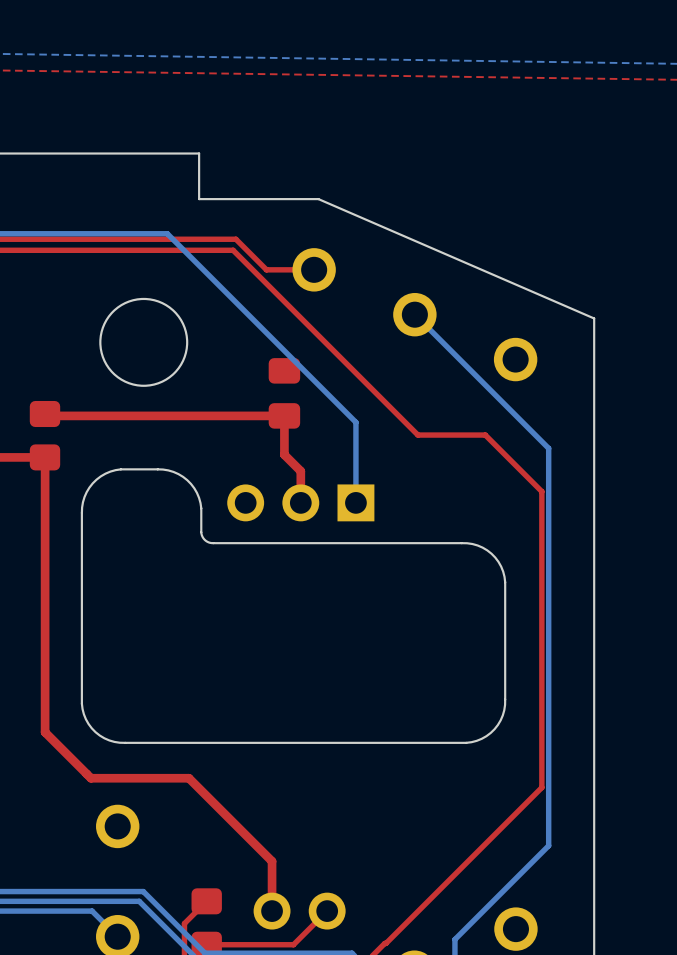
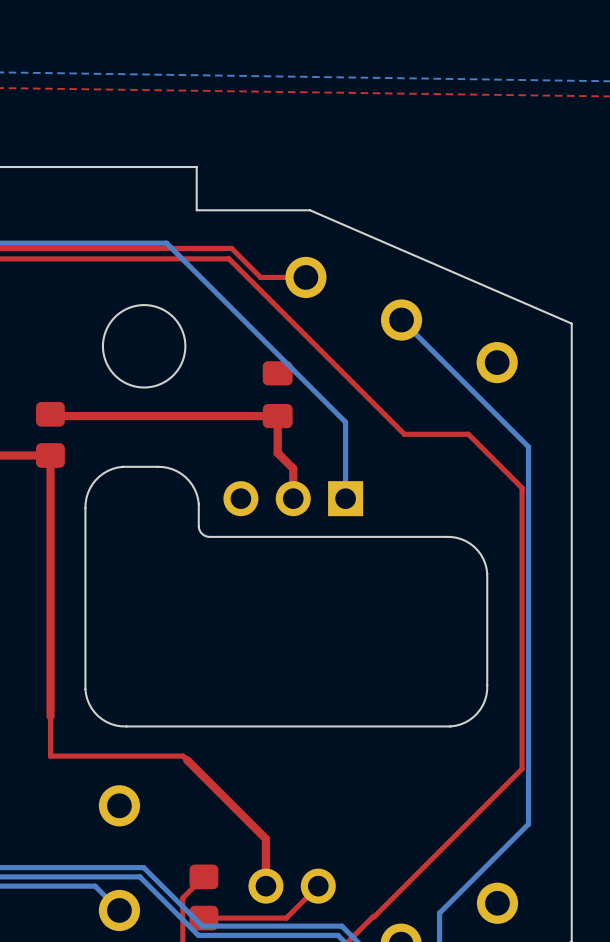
top track: (45, 732) (91, 778) (188, 778) -> (91, 756) (183, 756) (187, 760)
top track: none -> (50, 716) (50, 756) (90, 756)

